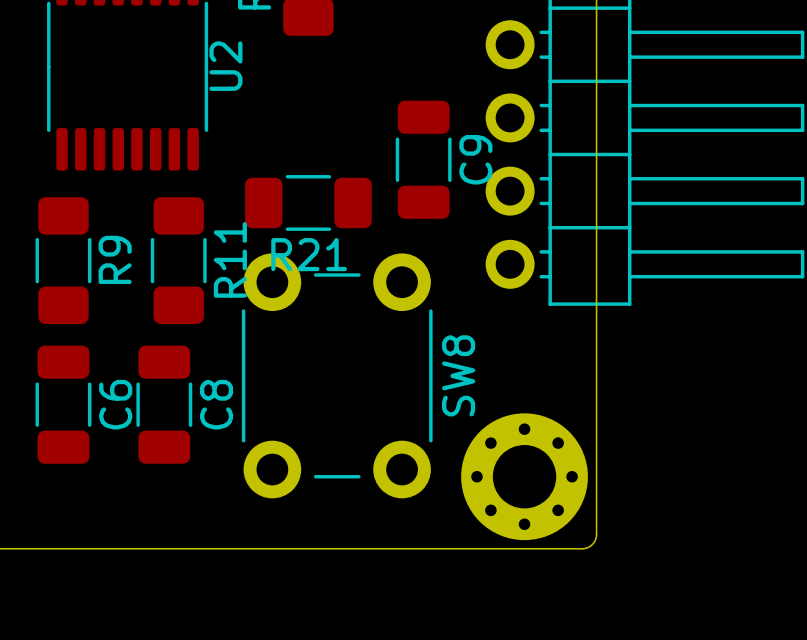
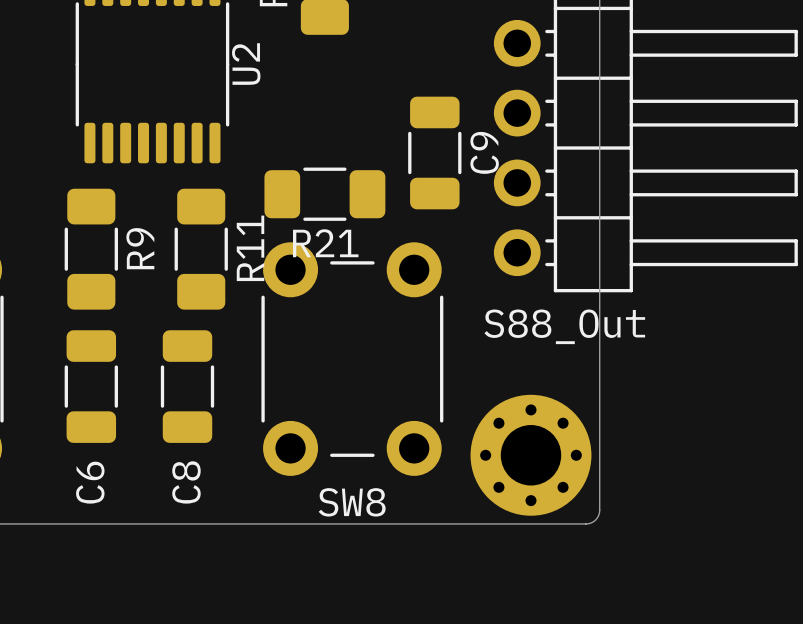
part value: none -> S88_Out (564, 326)
SW8 name rotation: 0° (458, 375) -> 90° clockwise (352, 502)
SW8 name position: SW8 (458, 375) -> SW8 (352, 502)
C6 name position: C6 (115, 404) -> C6 (90, 482)
C8 name position: C8 (216, 404) -> C8 (186, 482)

